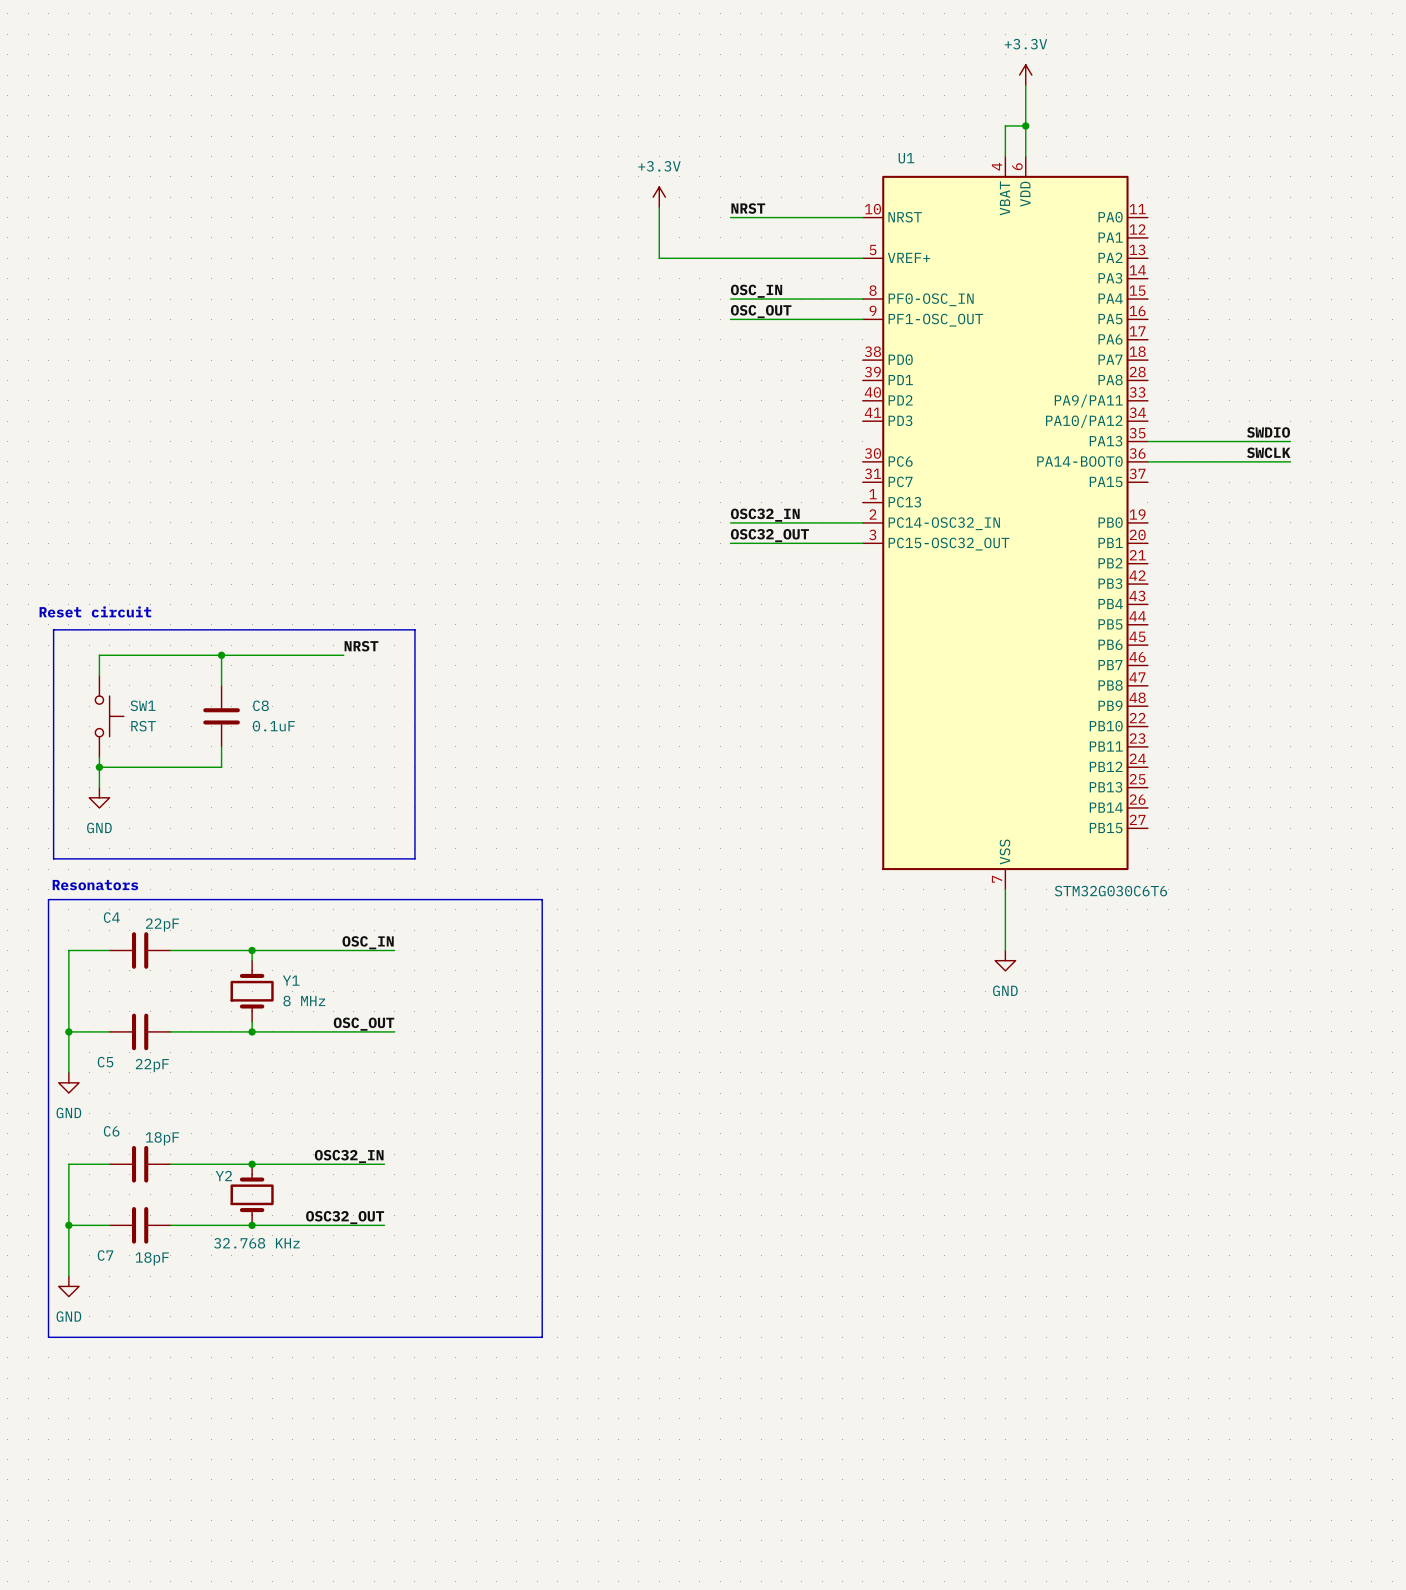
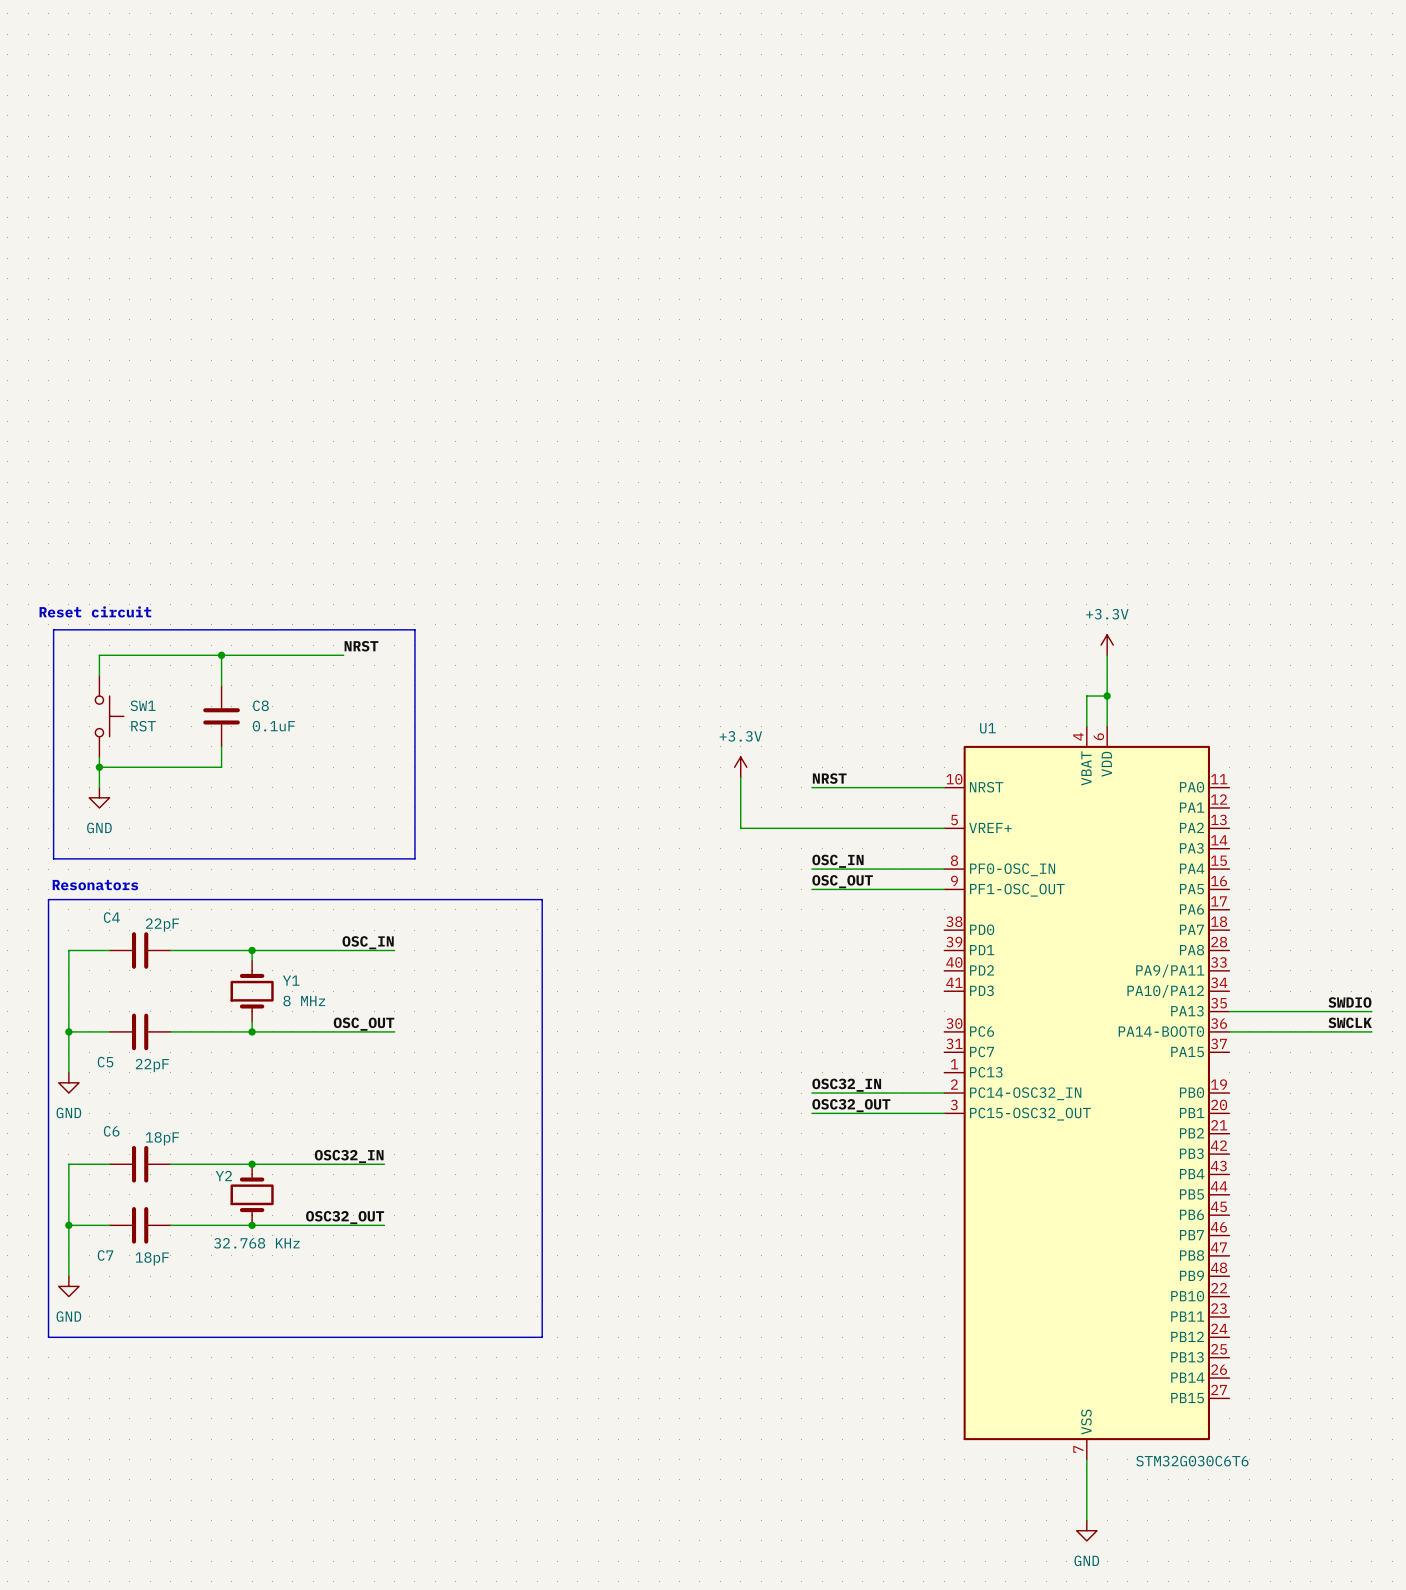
power symbol: +3.3V (1025, 75) -> none
wire: (1025, 85) (1025, 156) -> none
wire: (1025, 125) (1005, 125) (1005, 156) -> none
junction: (1025, 125) -> none
power symbol: +3.3V (659, 197) -> none
wire: (659, 207) (659, 258) (862, 258) -> none
label: NRST (748, 208) -> none
wire: (730, 217) (862, 217) -> none
label: OSC_IN (756, 291) -> none
wire: (730, 299) (862, 299) -> none
label: OSC_OUT (761, 311) -> none
wire: (730, 319) (862, 319) -> none
label: SWDIO (1268, 432) -> none
wire: (1147, 441) (1290, 441) -> none
label: SWCLK (1268, 452) -> none
wire: (1147, 461) (1290, 461) -> none
label: OSC32_IN (765, 515) -> none
wire: (730, 522) (862, 522) -> none
U1 position: (1005, 522) -> (1086, 1093)
label: OSC32_OUT (769, 535) -> none
wire: (730, 543) (862, 543) -> none
power symbol: none -> +3.3V (1107, 645)
junction: none -> (1107, 696)
power symbol: none -> +3.3V (740, 767)
wire: none -> (740, 777) (740, 828) (944, 828)
label: none -> NRST (829, 778)
wire: none -> (811, 787) (944, 787)
label: none -> OSC_IN (837, 861)
wire: none -> (811, 869) (944, 869)
label: none -> OSC_OUT (842, 881)
wire: none -> (811, 889) (944, 889)
power symbol: GND (1005, 960) -> none
label: none -> SWDIO (1349, 1002)
wire: none -> (1229, 1011) (1371, 1011)
label: none -> SWCLK (1350, 1022)
wire: none -> (1229, 1031) (1371, 1031)
label: none -> OSC32_IN (846, 1085)
wire: none -> (811, 1093) (944, 1093)
label: none -> OSC32_OUT (851, 1105)
wire: none -> (811, 1113) (944, 1113)
wire: none -> (1086, 1459) (1086, 1520)
power symbol: none -> GND (1086, 1530)

